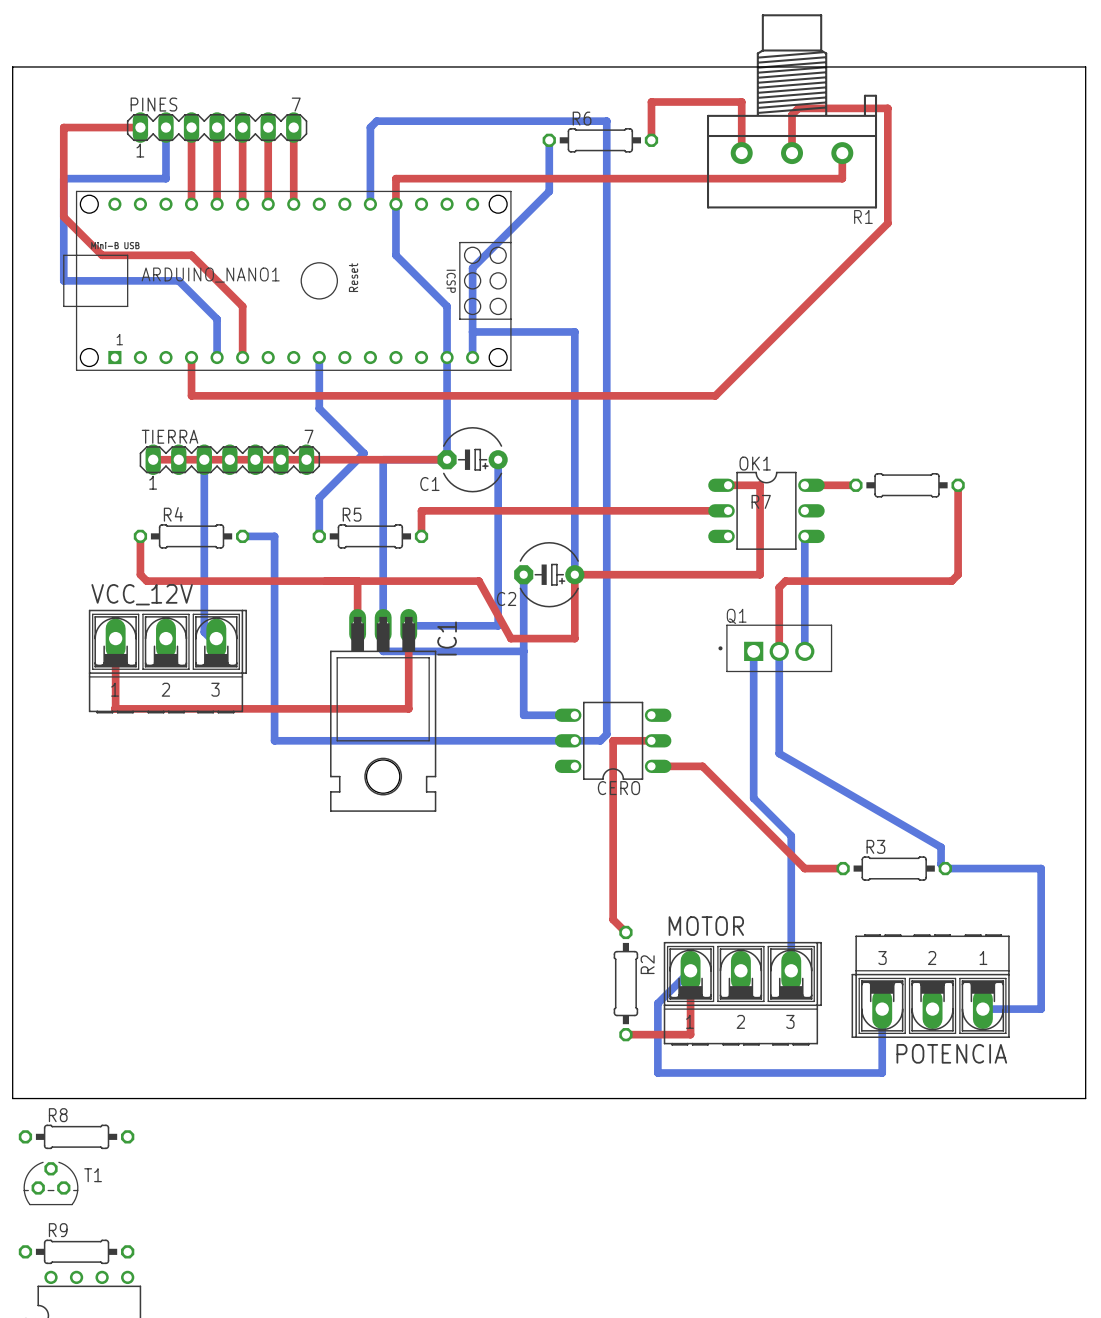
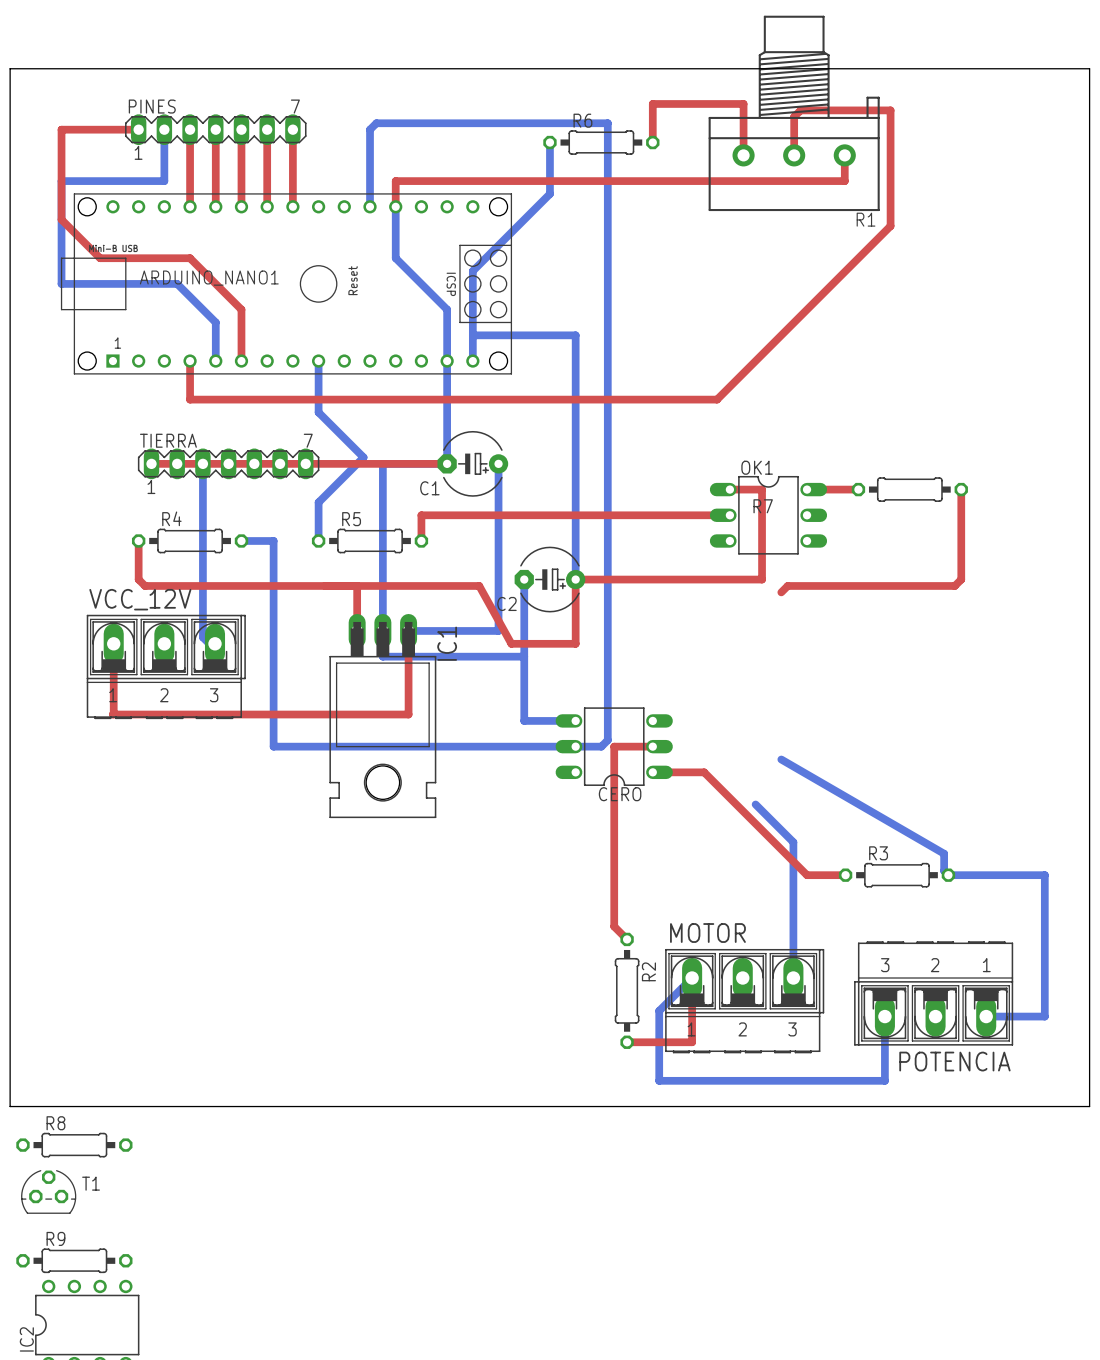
bottom track: (804, 536) (804, 651) -> none
top track: (779, 587) (779, 651) -> none
Q1: (775, 648) -> none
bottom track: (753, 651) (753, 798) -> none
bottom track: (779, 651) (779, 753) -> none

